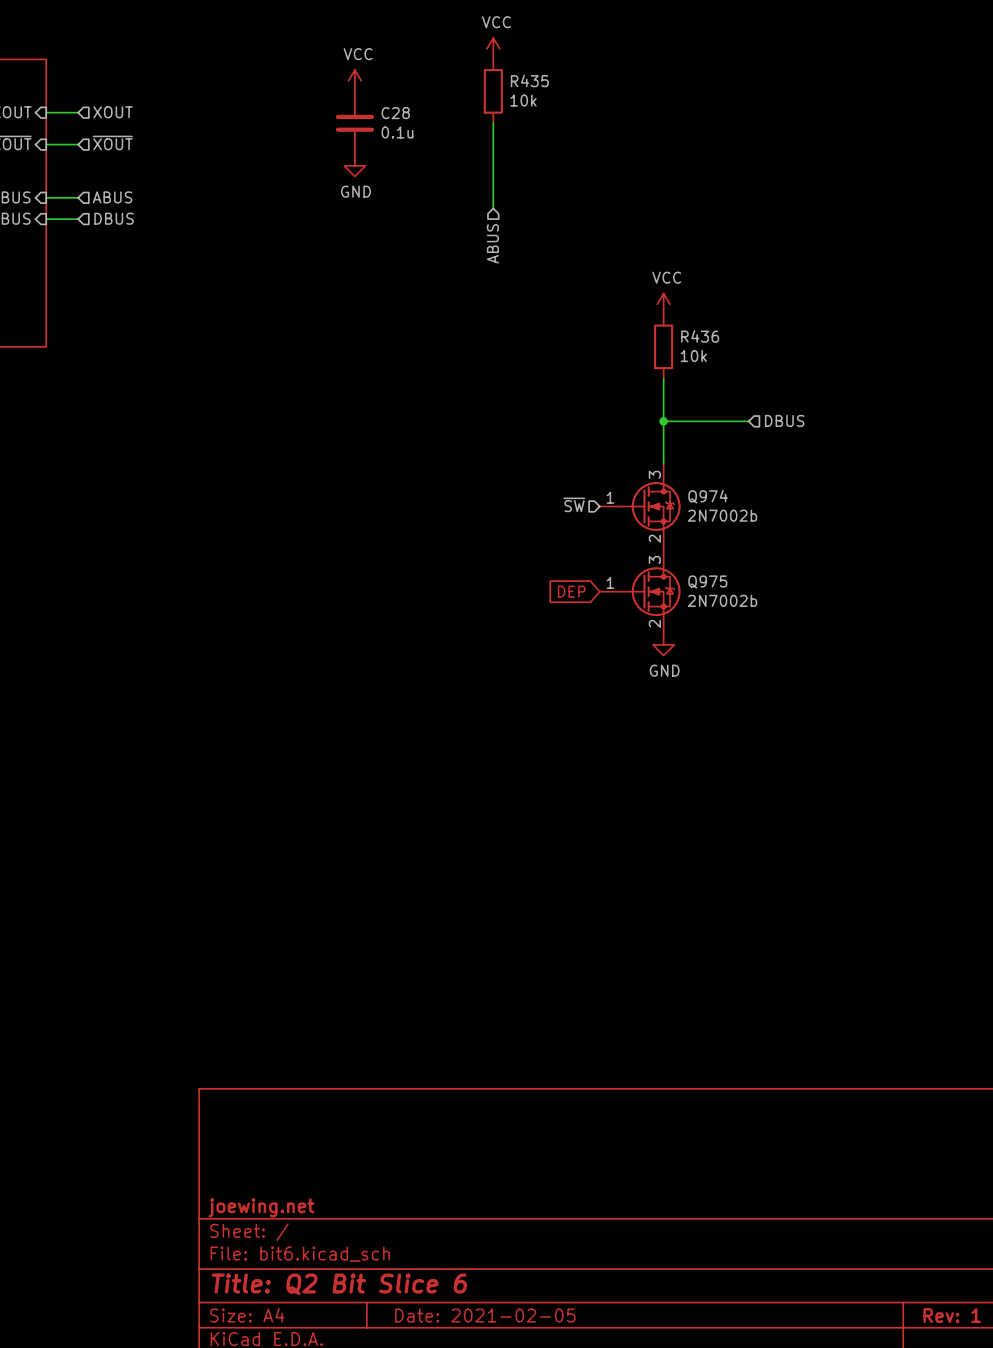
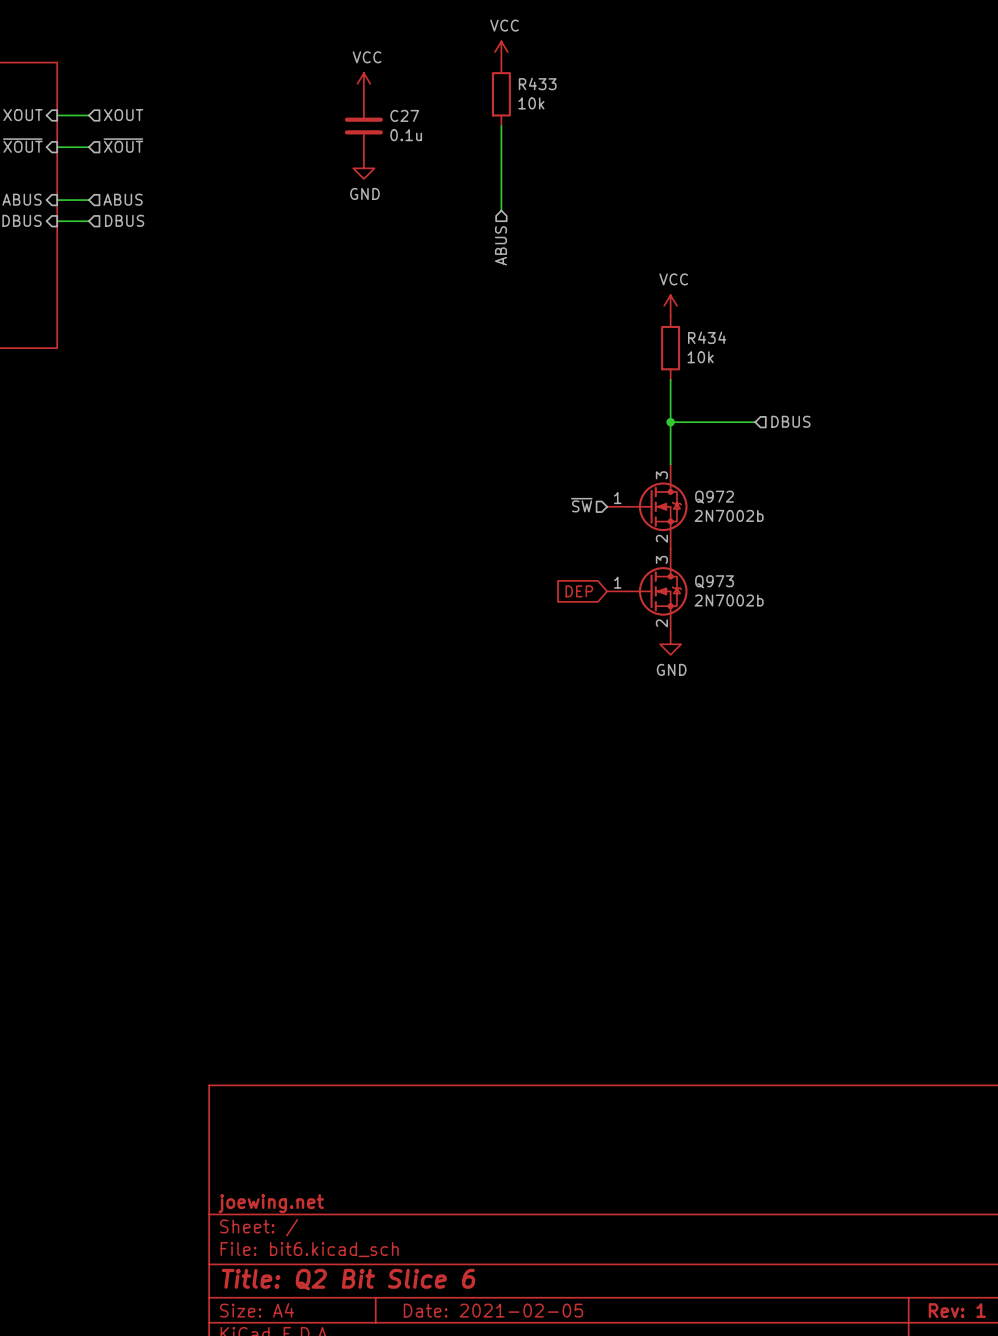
R435 name: R435 (529, 80) -> R433 (537, 83)
C28 name: C28 (395, 113) -> C27 (404, 115)
R436 name: R436 (700, 336) -> R434 (707, 337)
Q974 name: Q974 (708, 496) -> Q972 (714, 497)
Q975 name: Q975 (707, 581) -> Q973 (714, 581)

